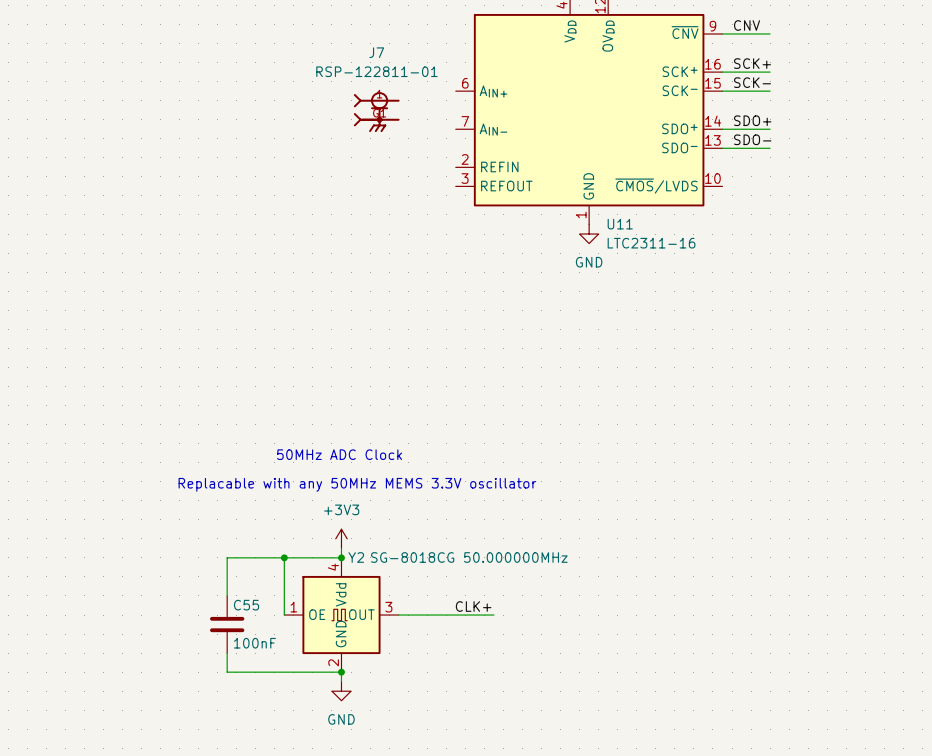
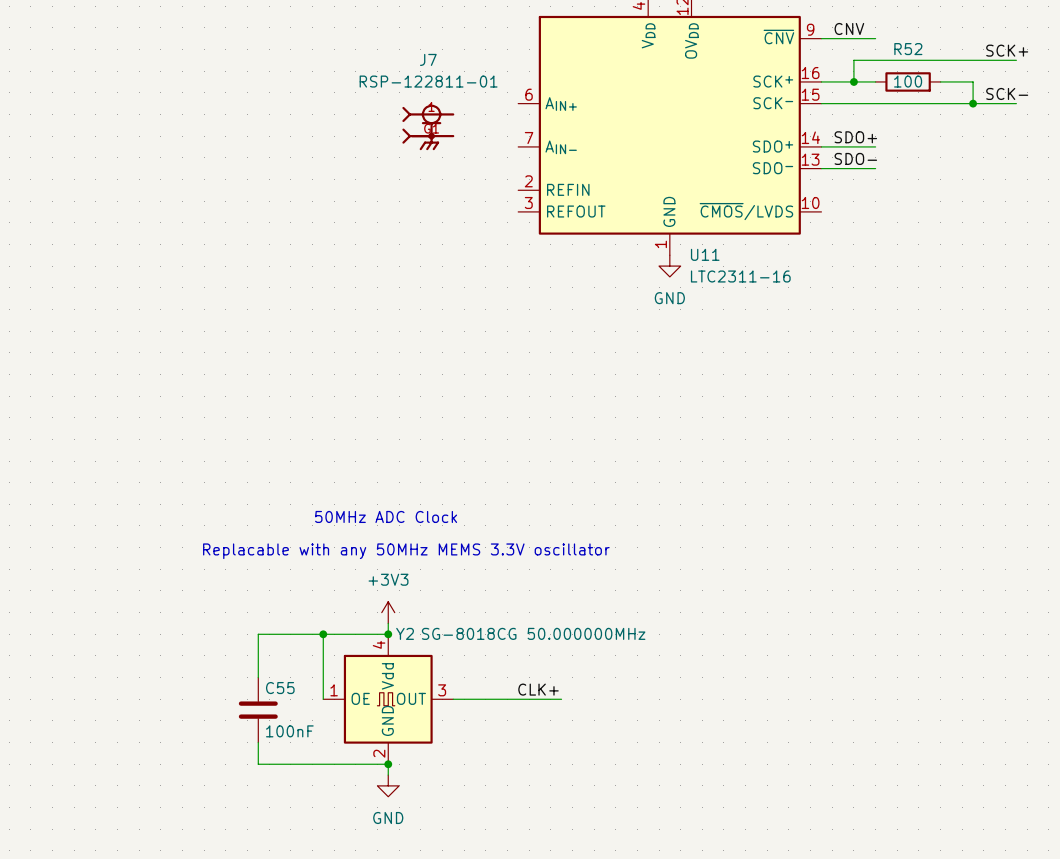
wire: none -> (1016, 60) (853, 60) (853, 81)
label position: SCK+ (752, 63) -> SCK+ (1007, 50)
junction: none -> (853, 81)
R52: none -> 100 (908, 81)
wire: none -> (940, 81) (973, 81) (973, 103)
label position: SCK- (752, 82) -> SCK- (1007, 93)
wire: none -> (875, 103) (1016, 103)
junction: none -> (973, 103)

